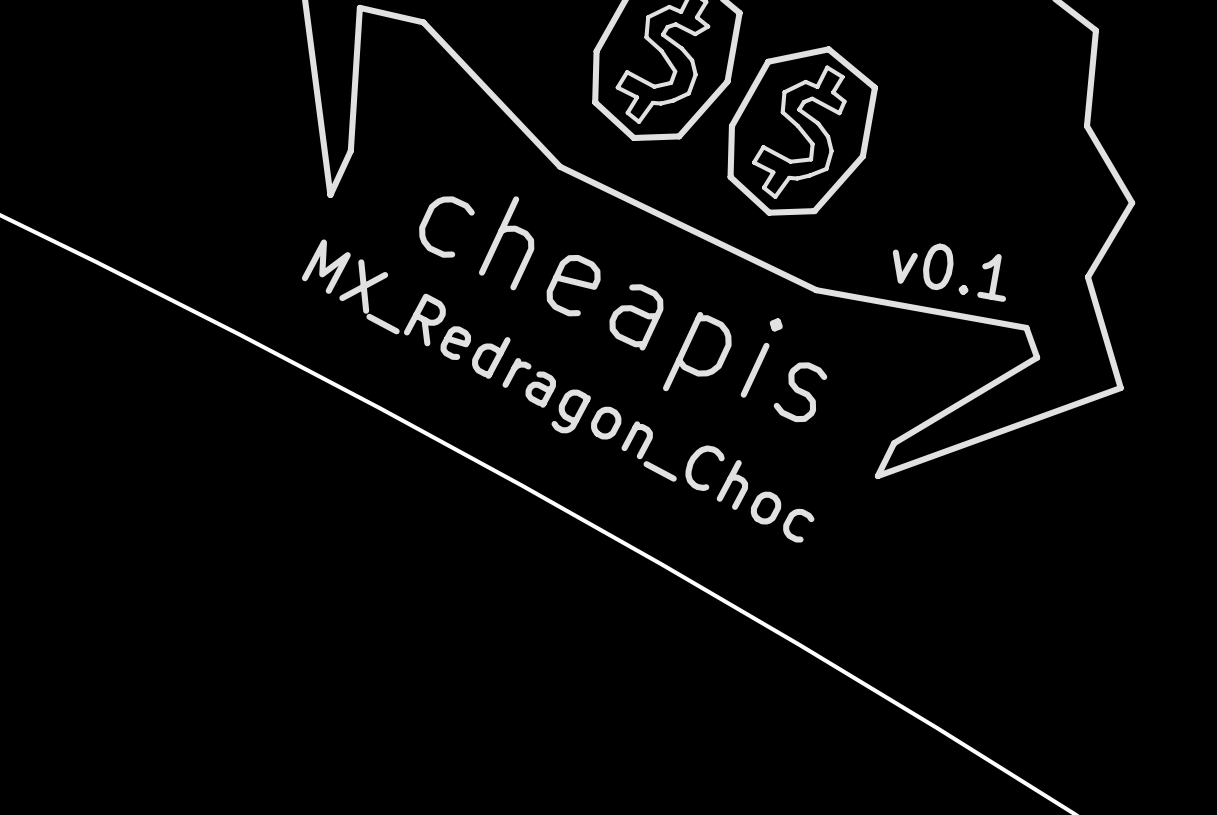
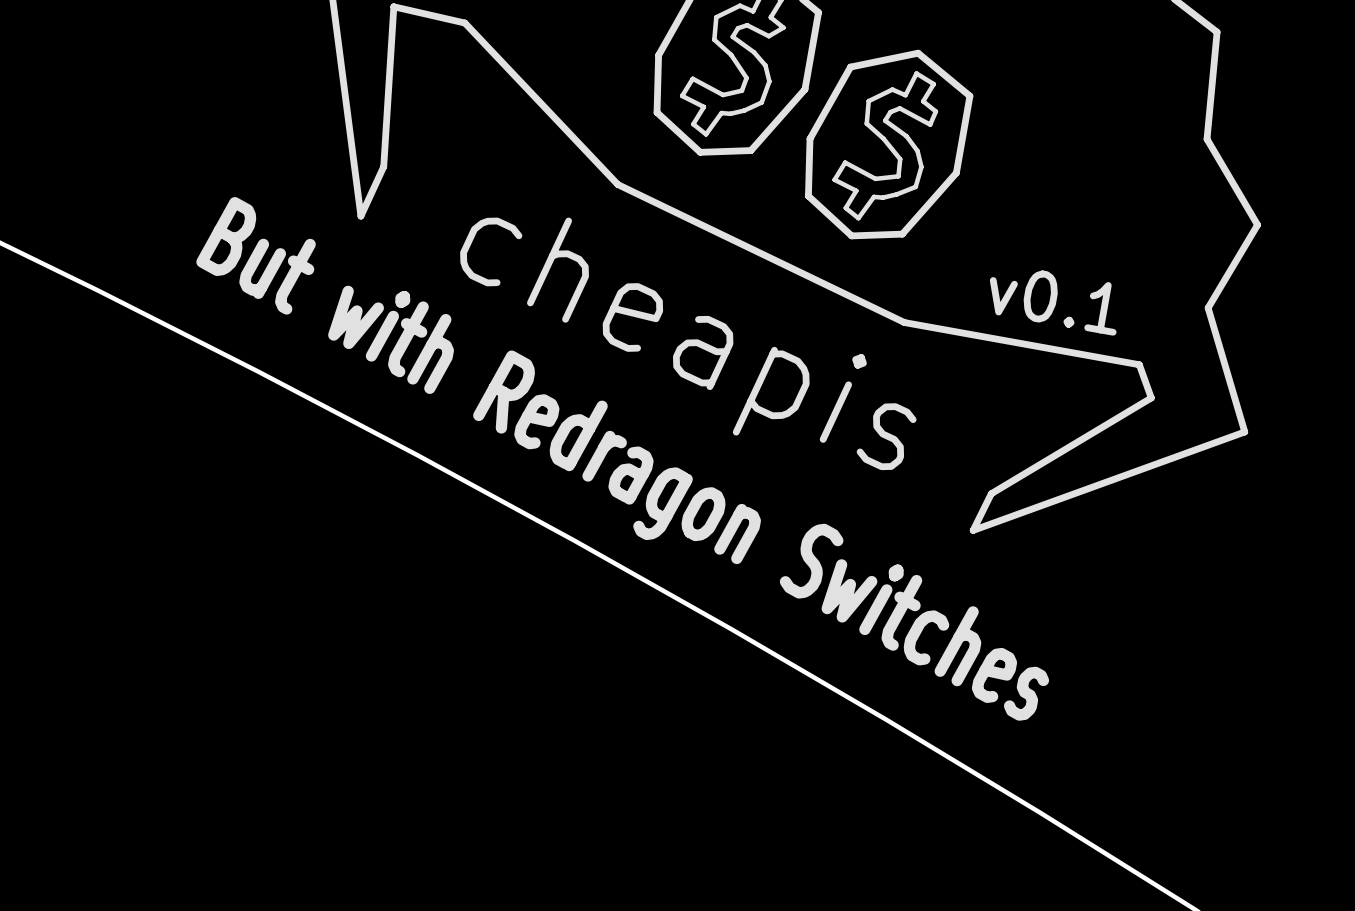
text: MX_Redragon_Choc (558, 391) -> none
text: none -> But with Redragon Switches (622, 458)

